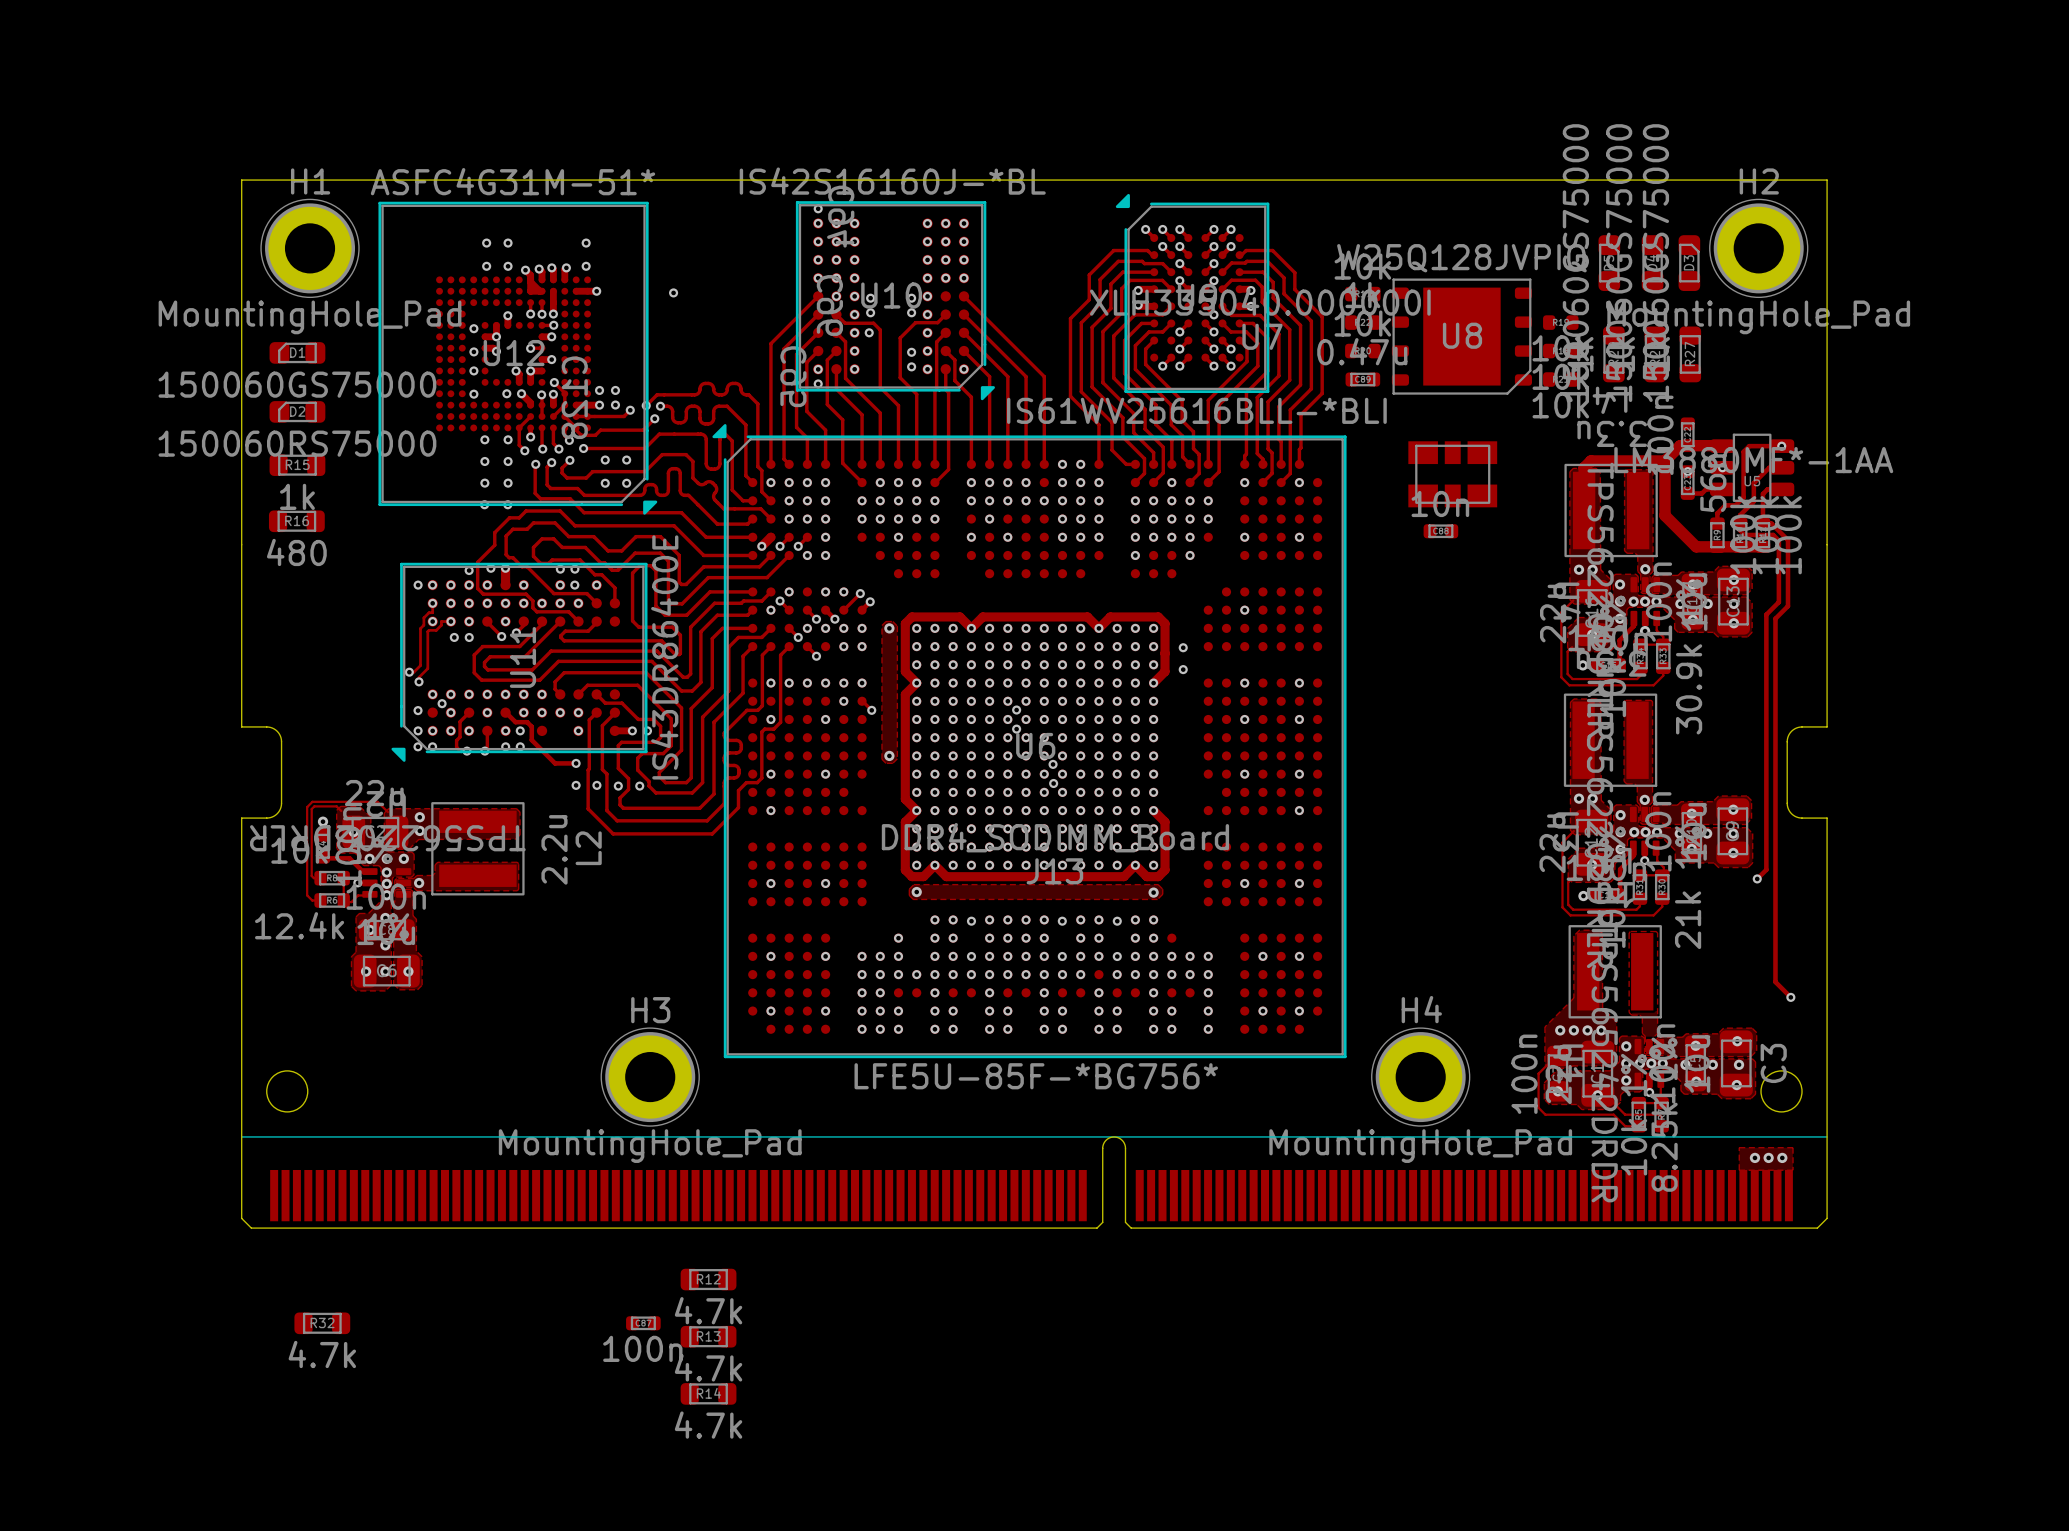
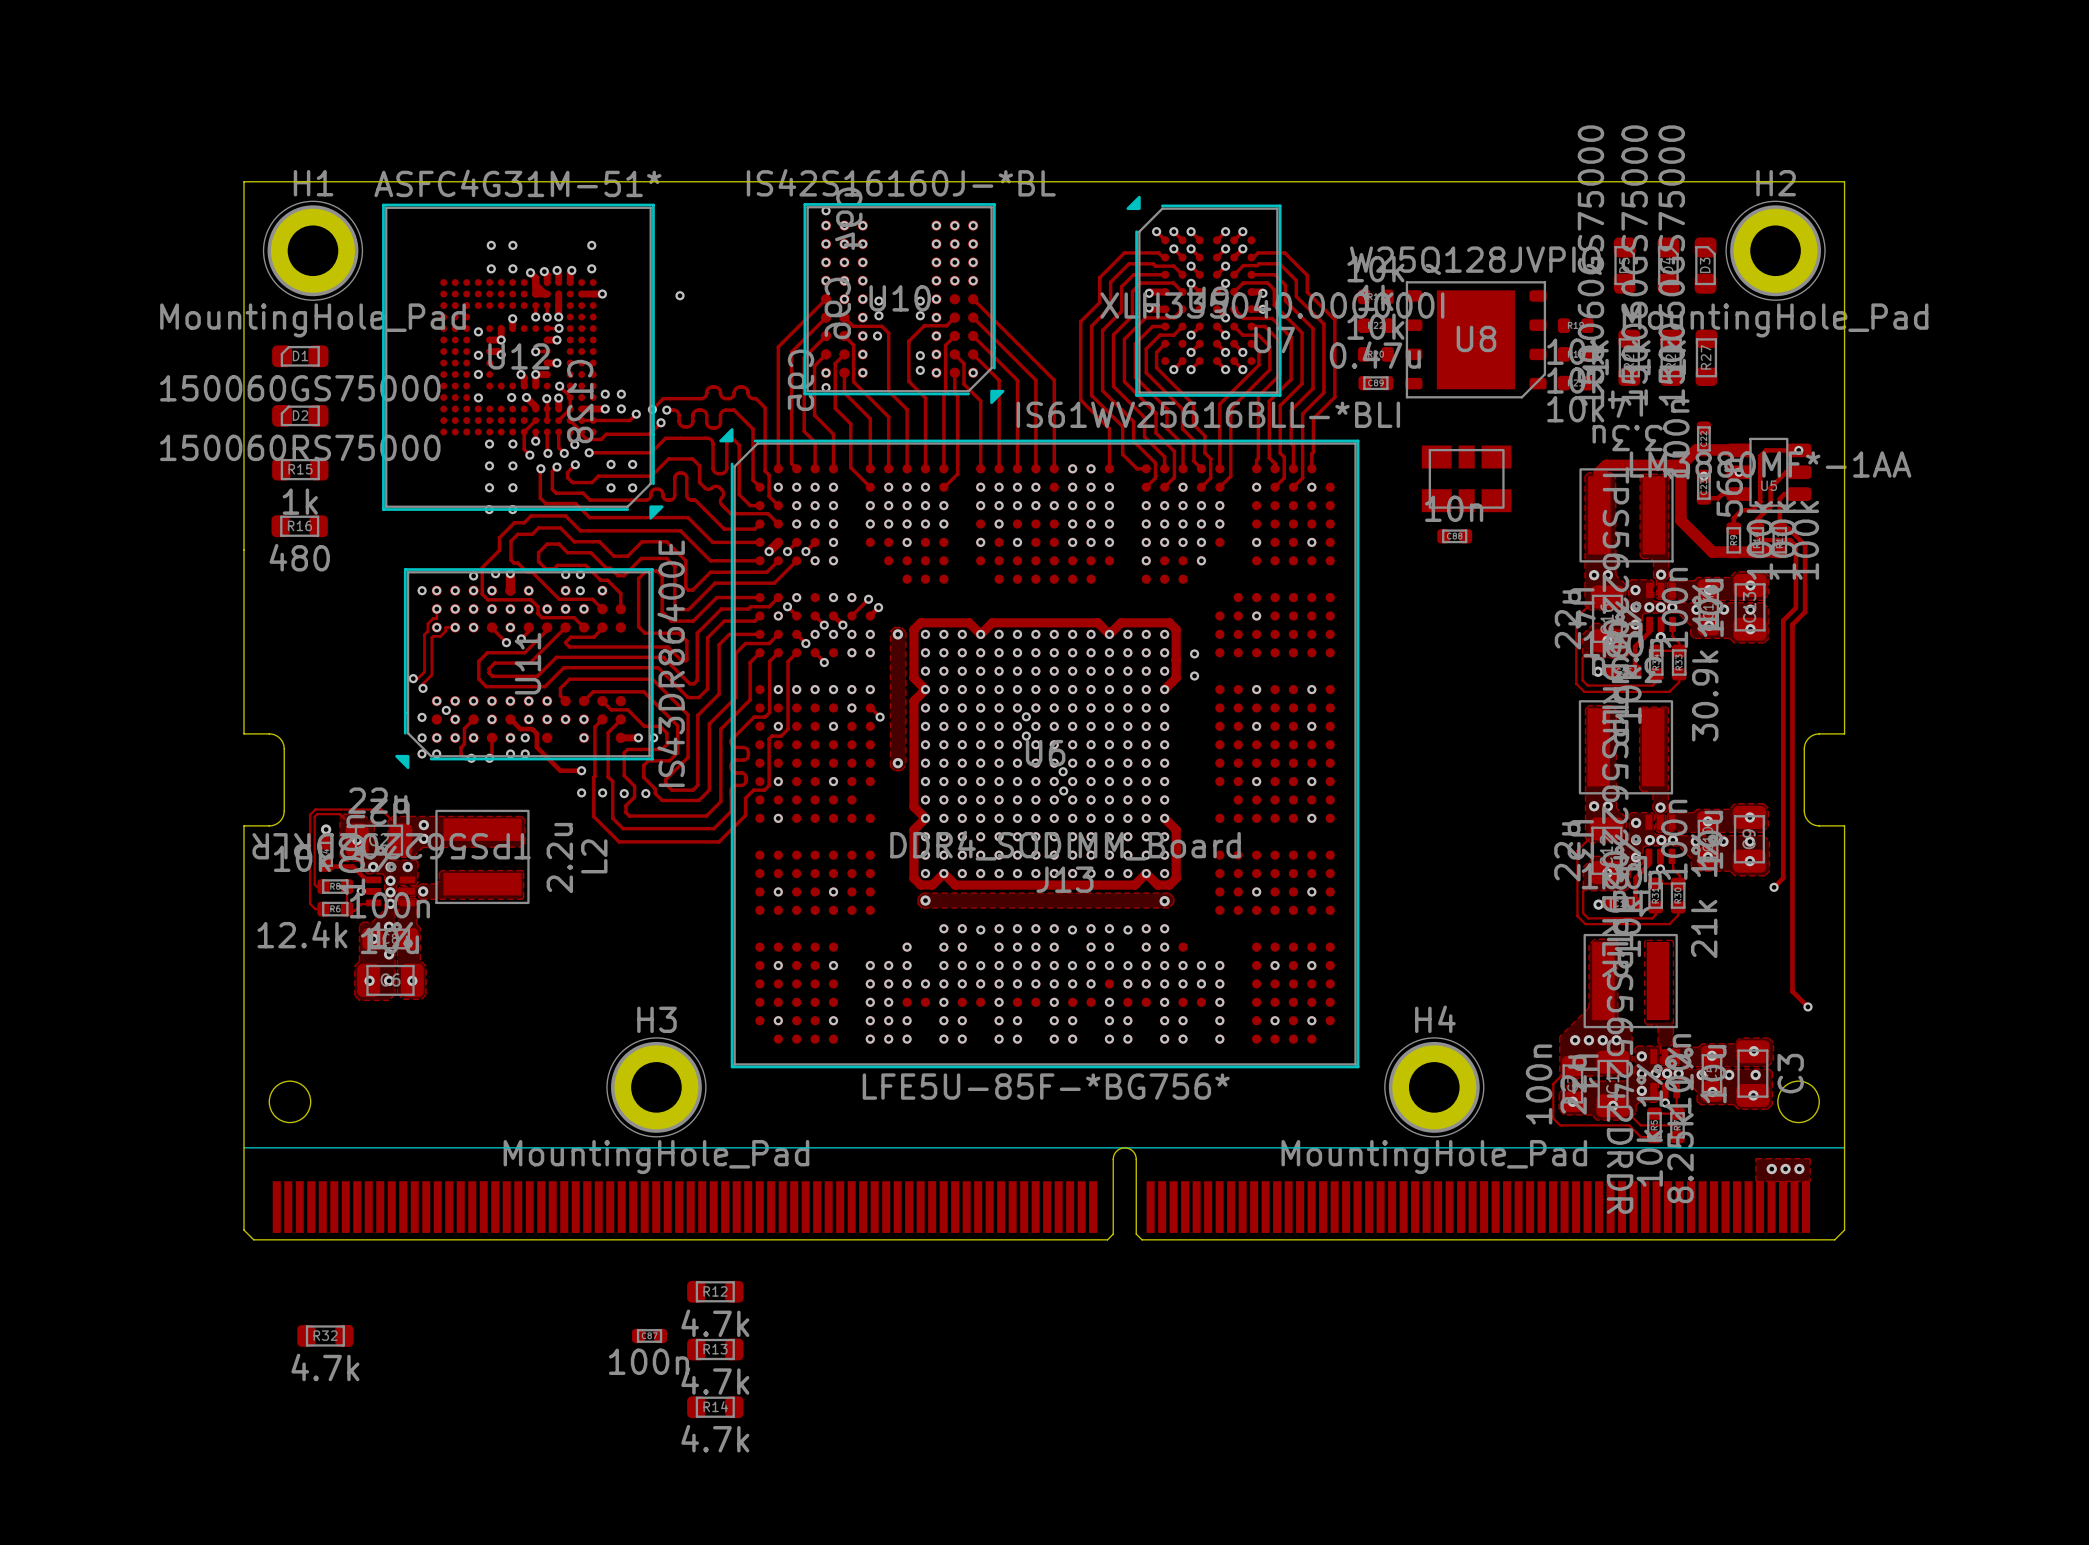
via: (454, 637) -> none
via: (469, 637) -> none

